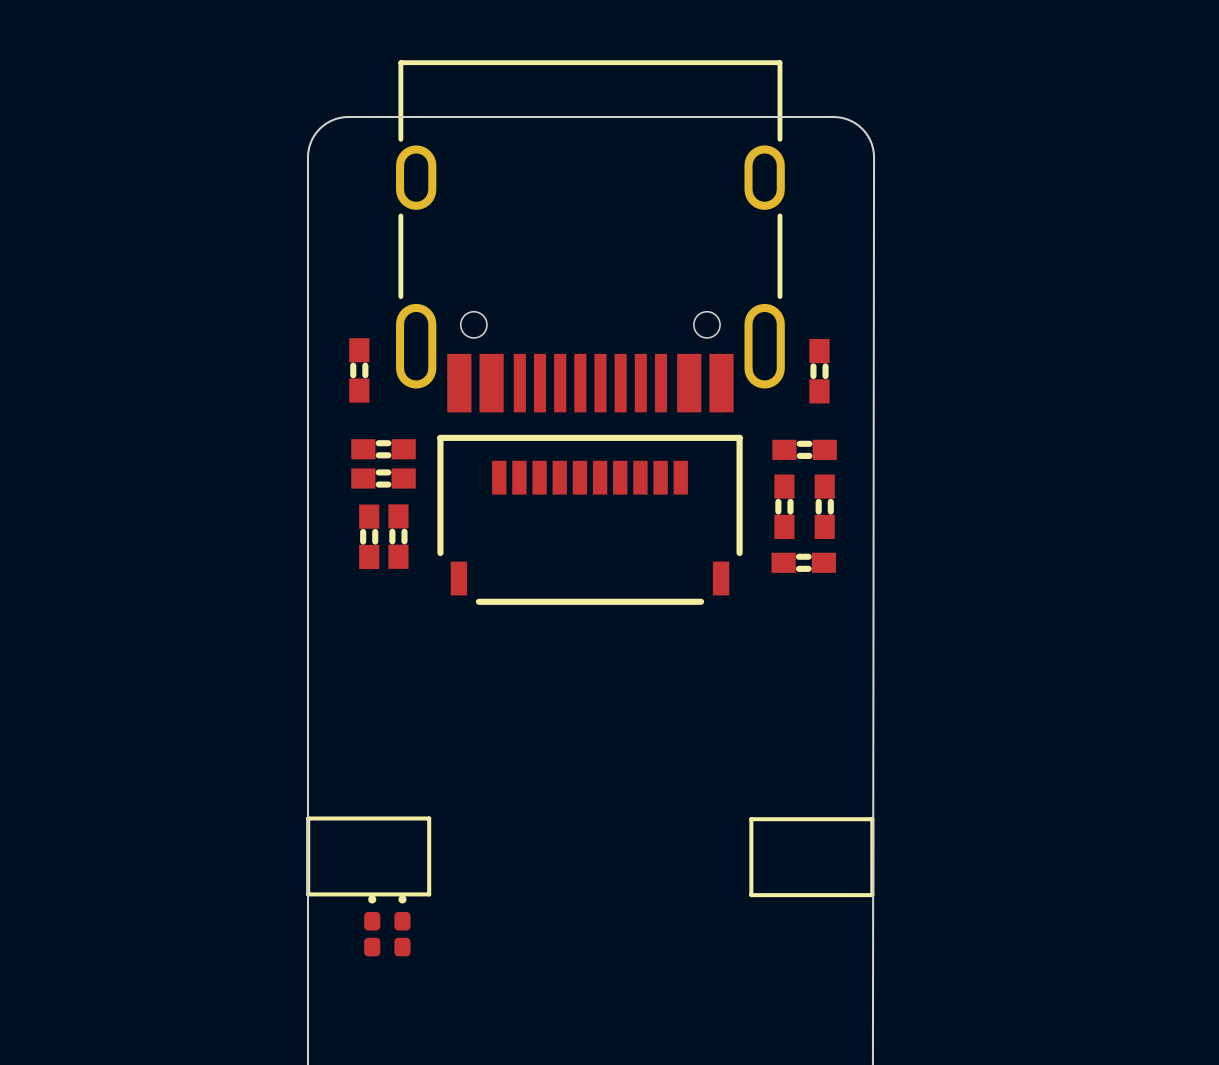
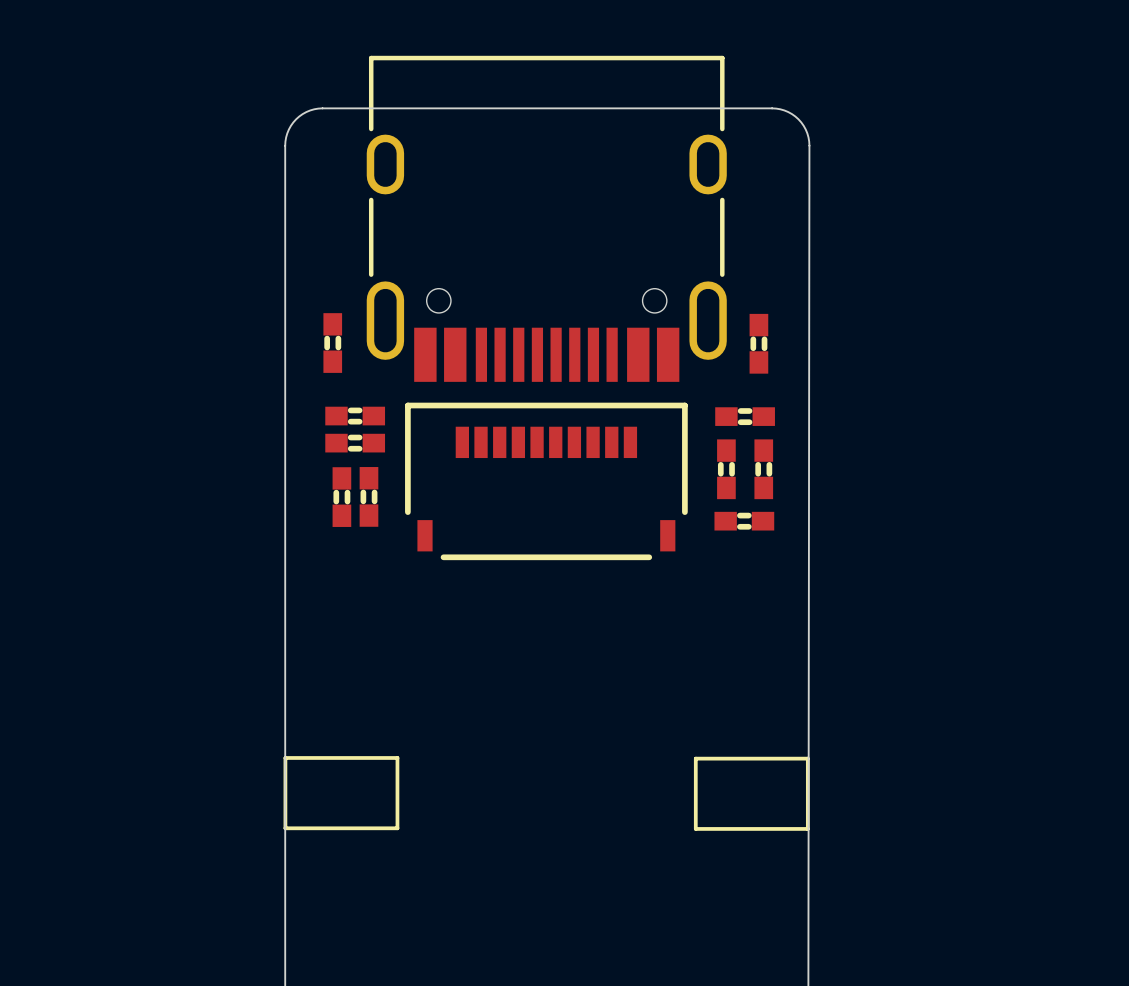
part: (372, 925) -> none
part: (402, 925) -> none

